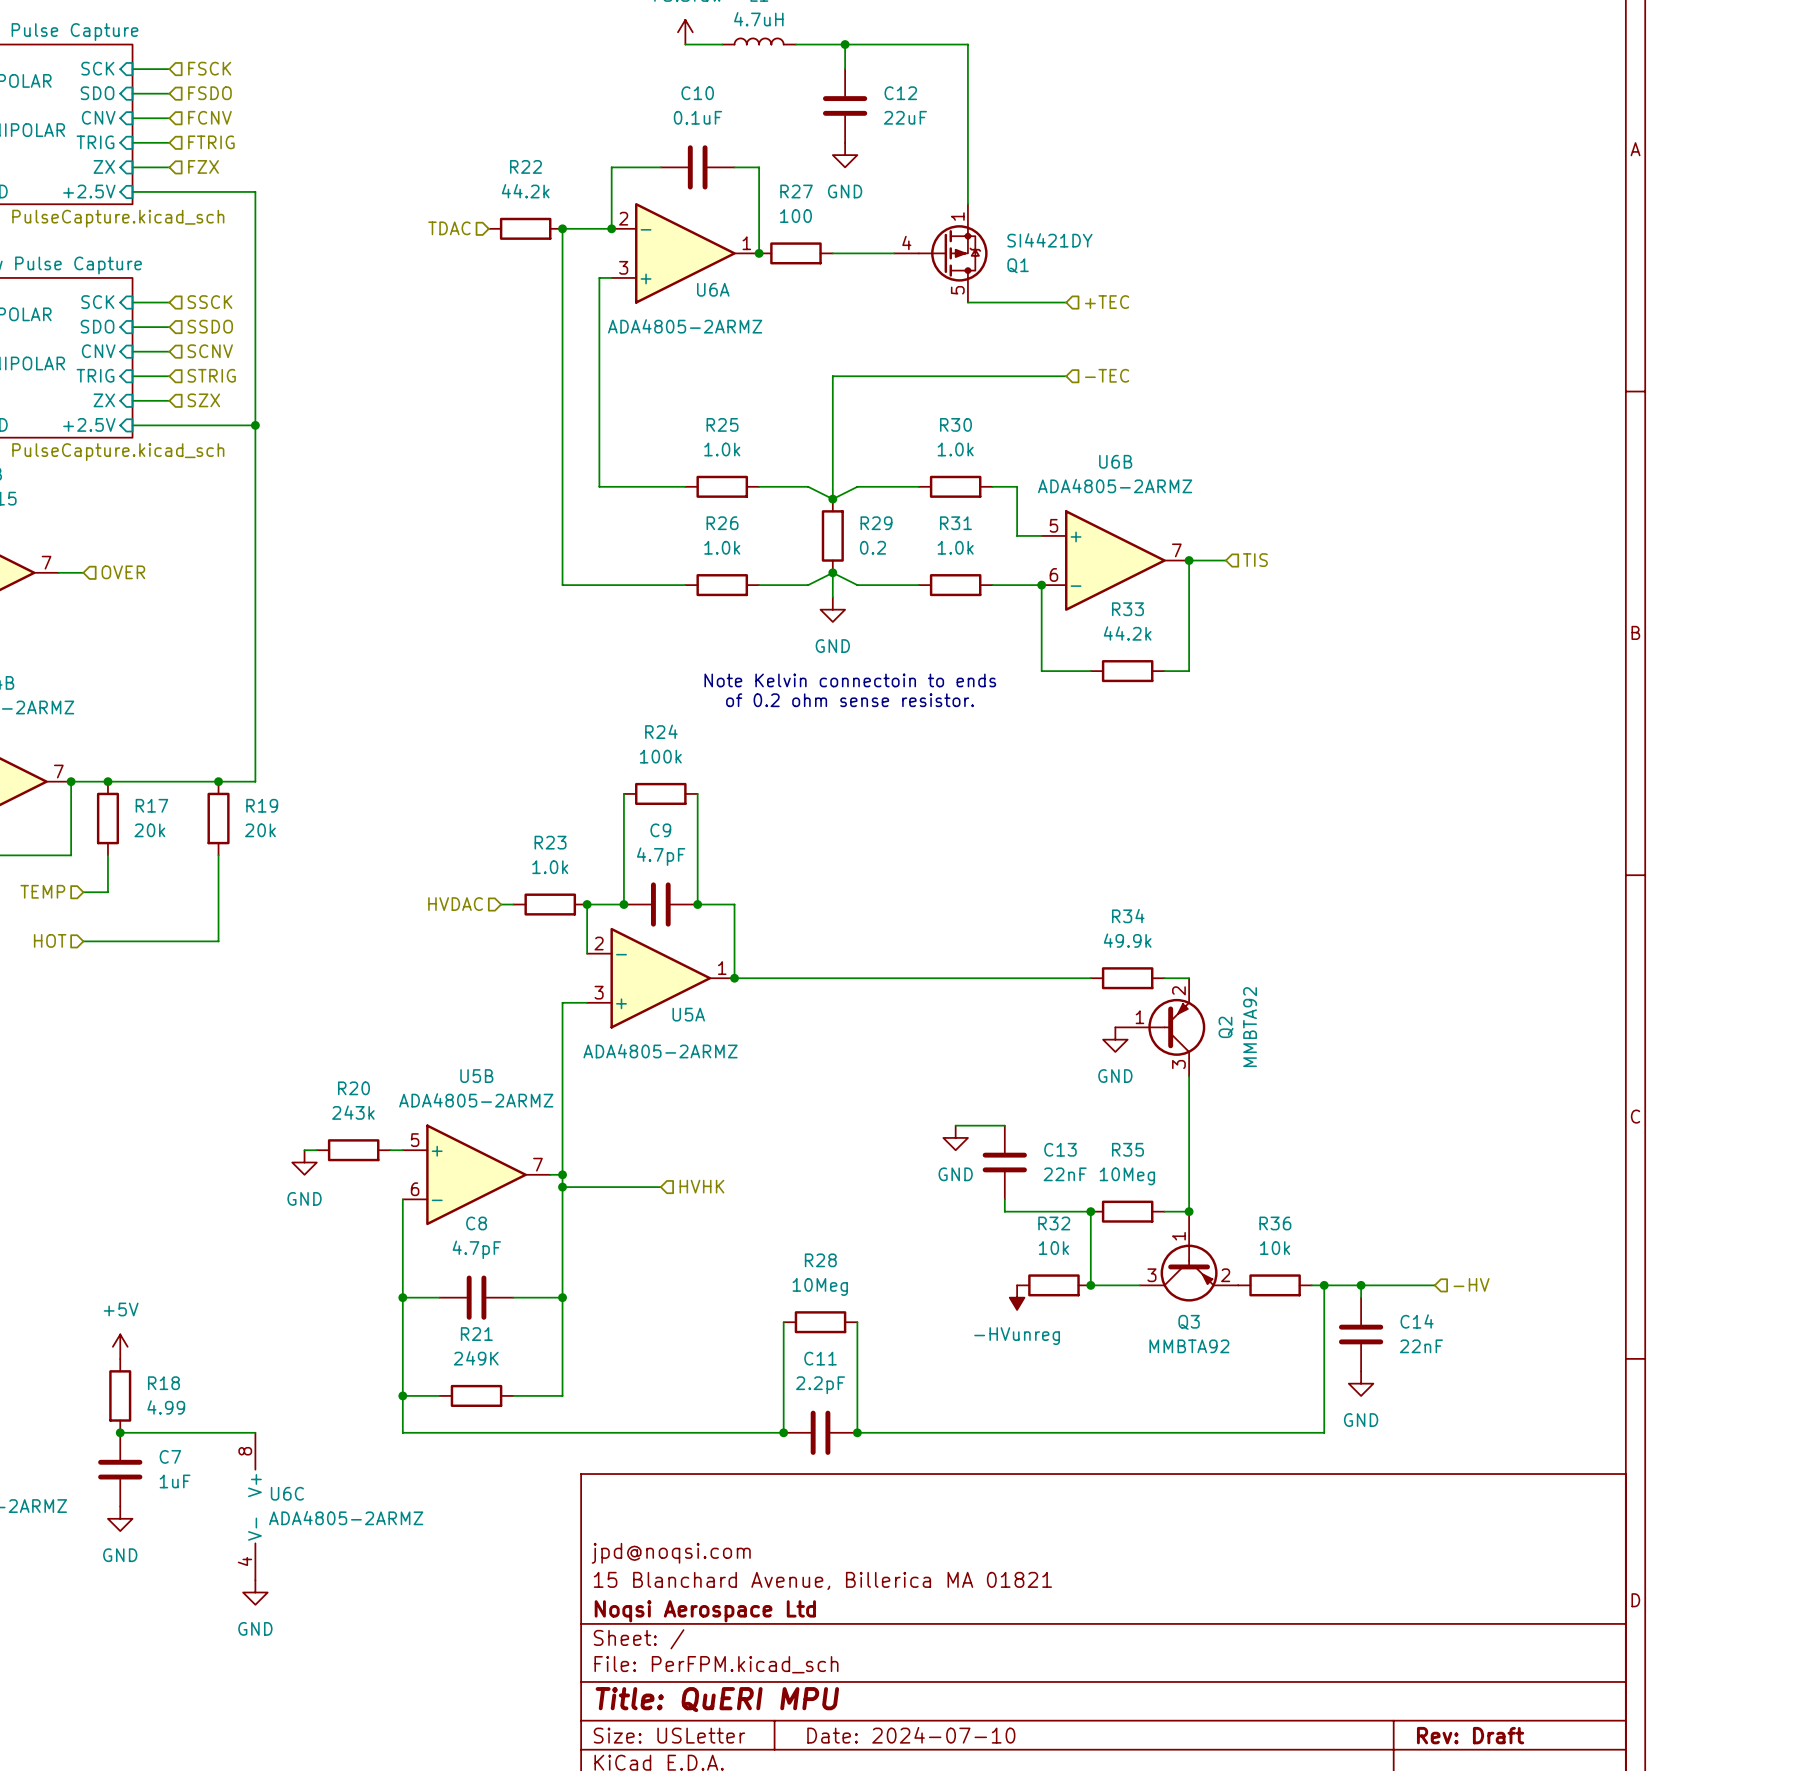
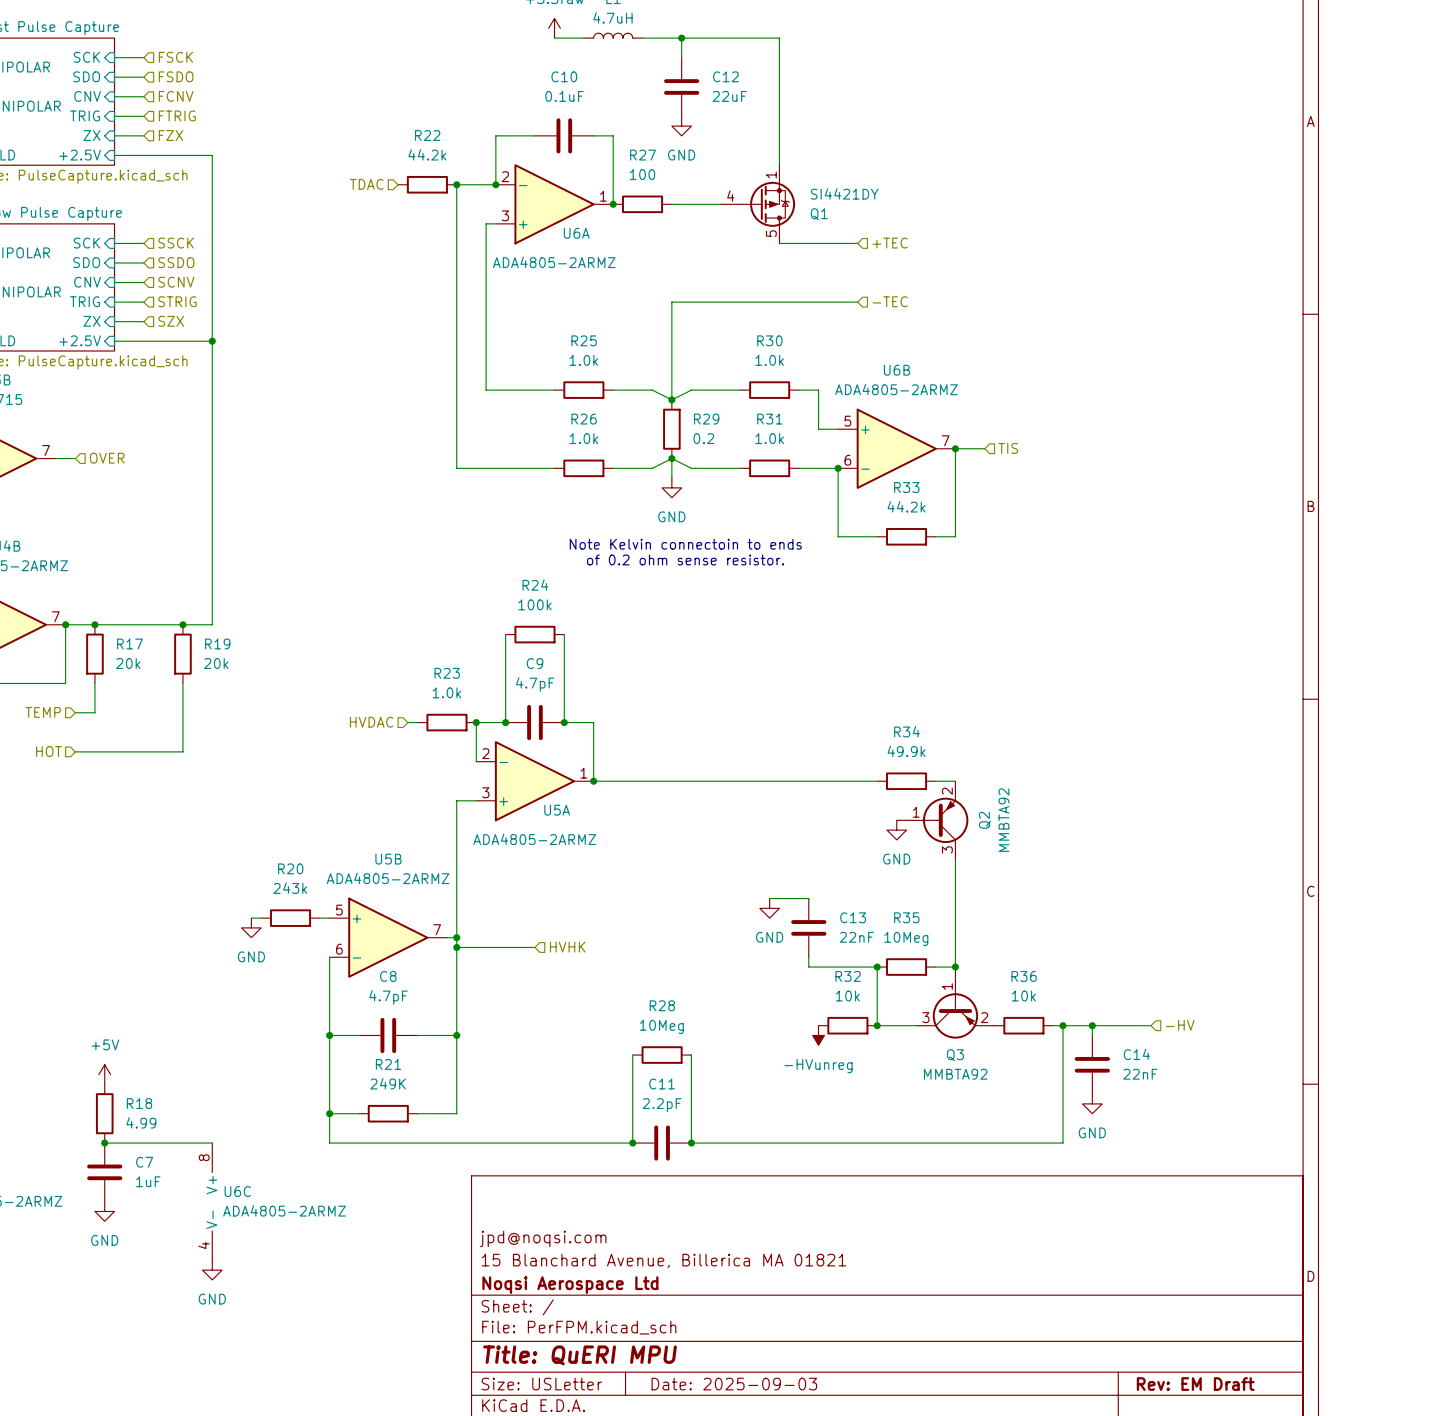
title block: Date: 2024-07-10 (911, 1735) -> Date: 2025-09-03 (734, 1384)
title block: Rev: Draft (1470, 1735) -> Rev: EM Draft (1195, 1384)

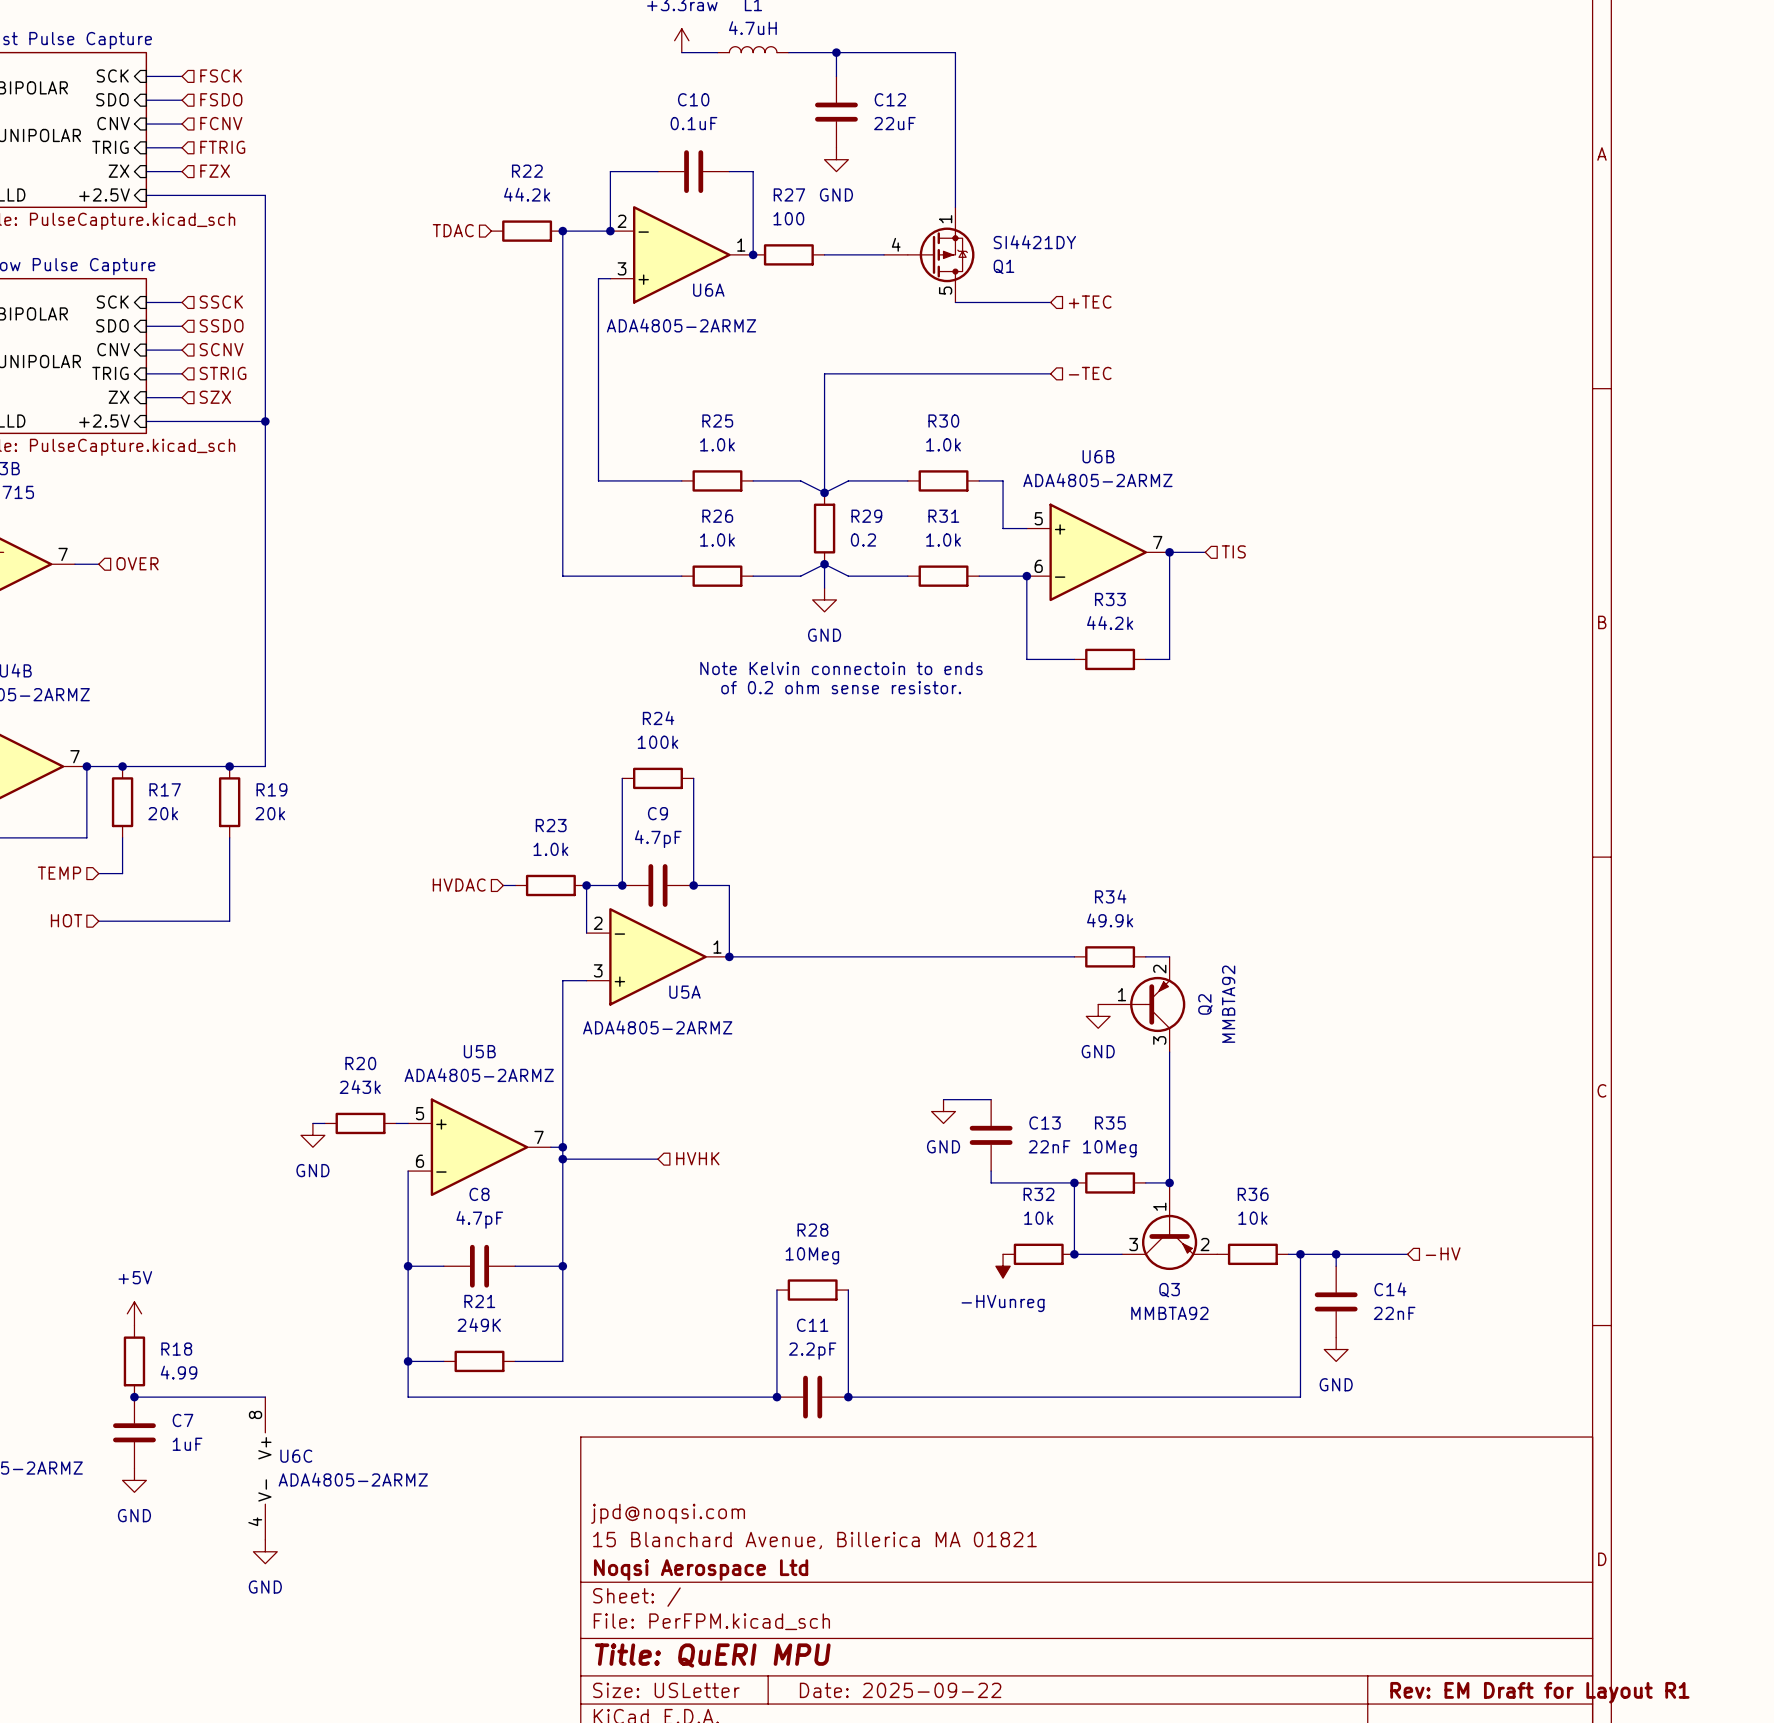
title block: Date: 2025-09-03 (734, 1384) -> Date: 2025-09-22 (900, 1690)
title block: Rev: EM Draft (1195, 1384) -> Rev: EM Draft for Layout R1 (1539, 1692)

